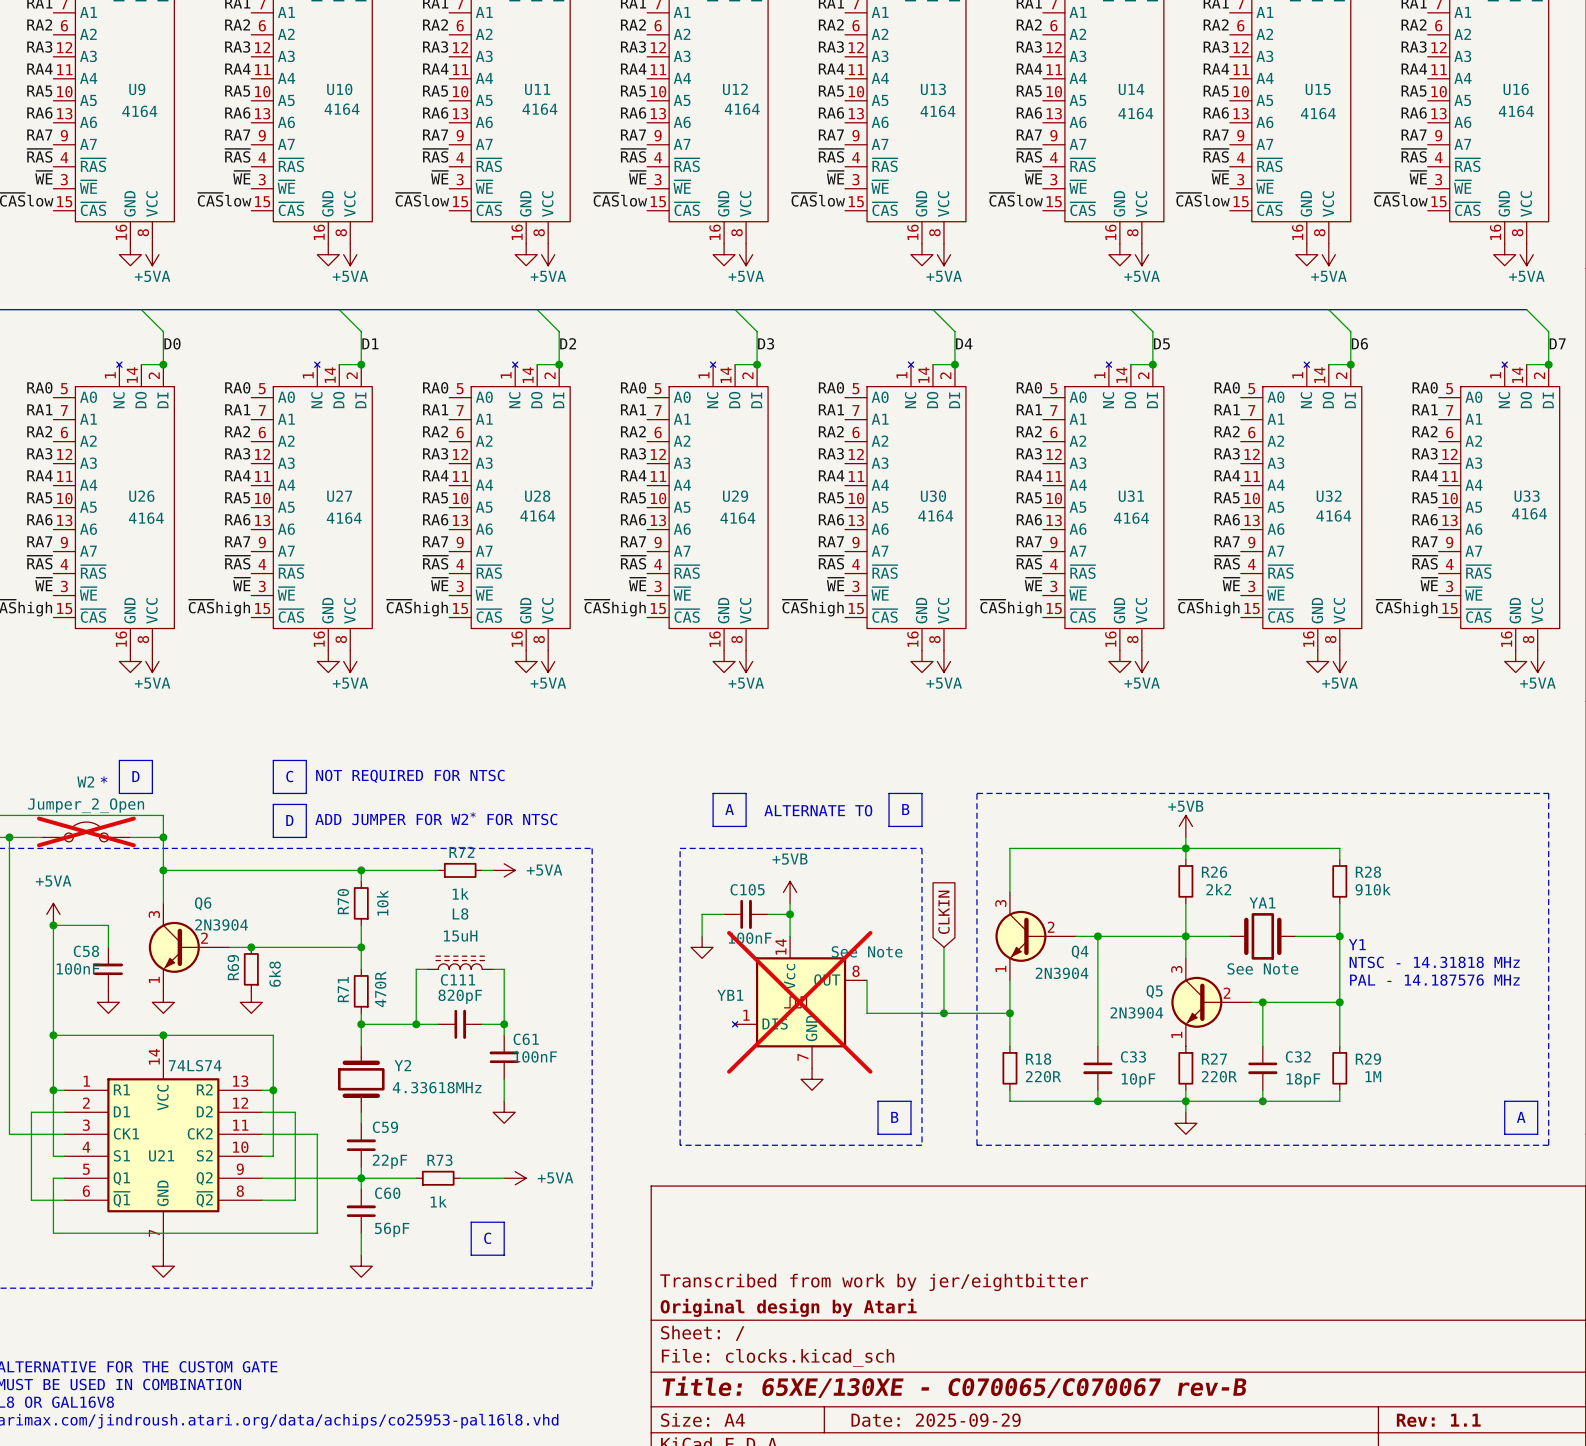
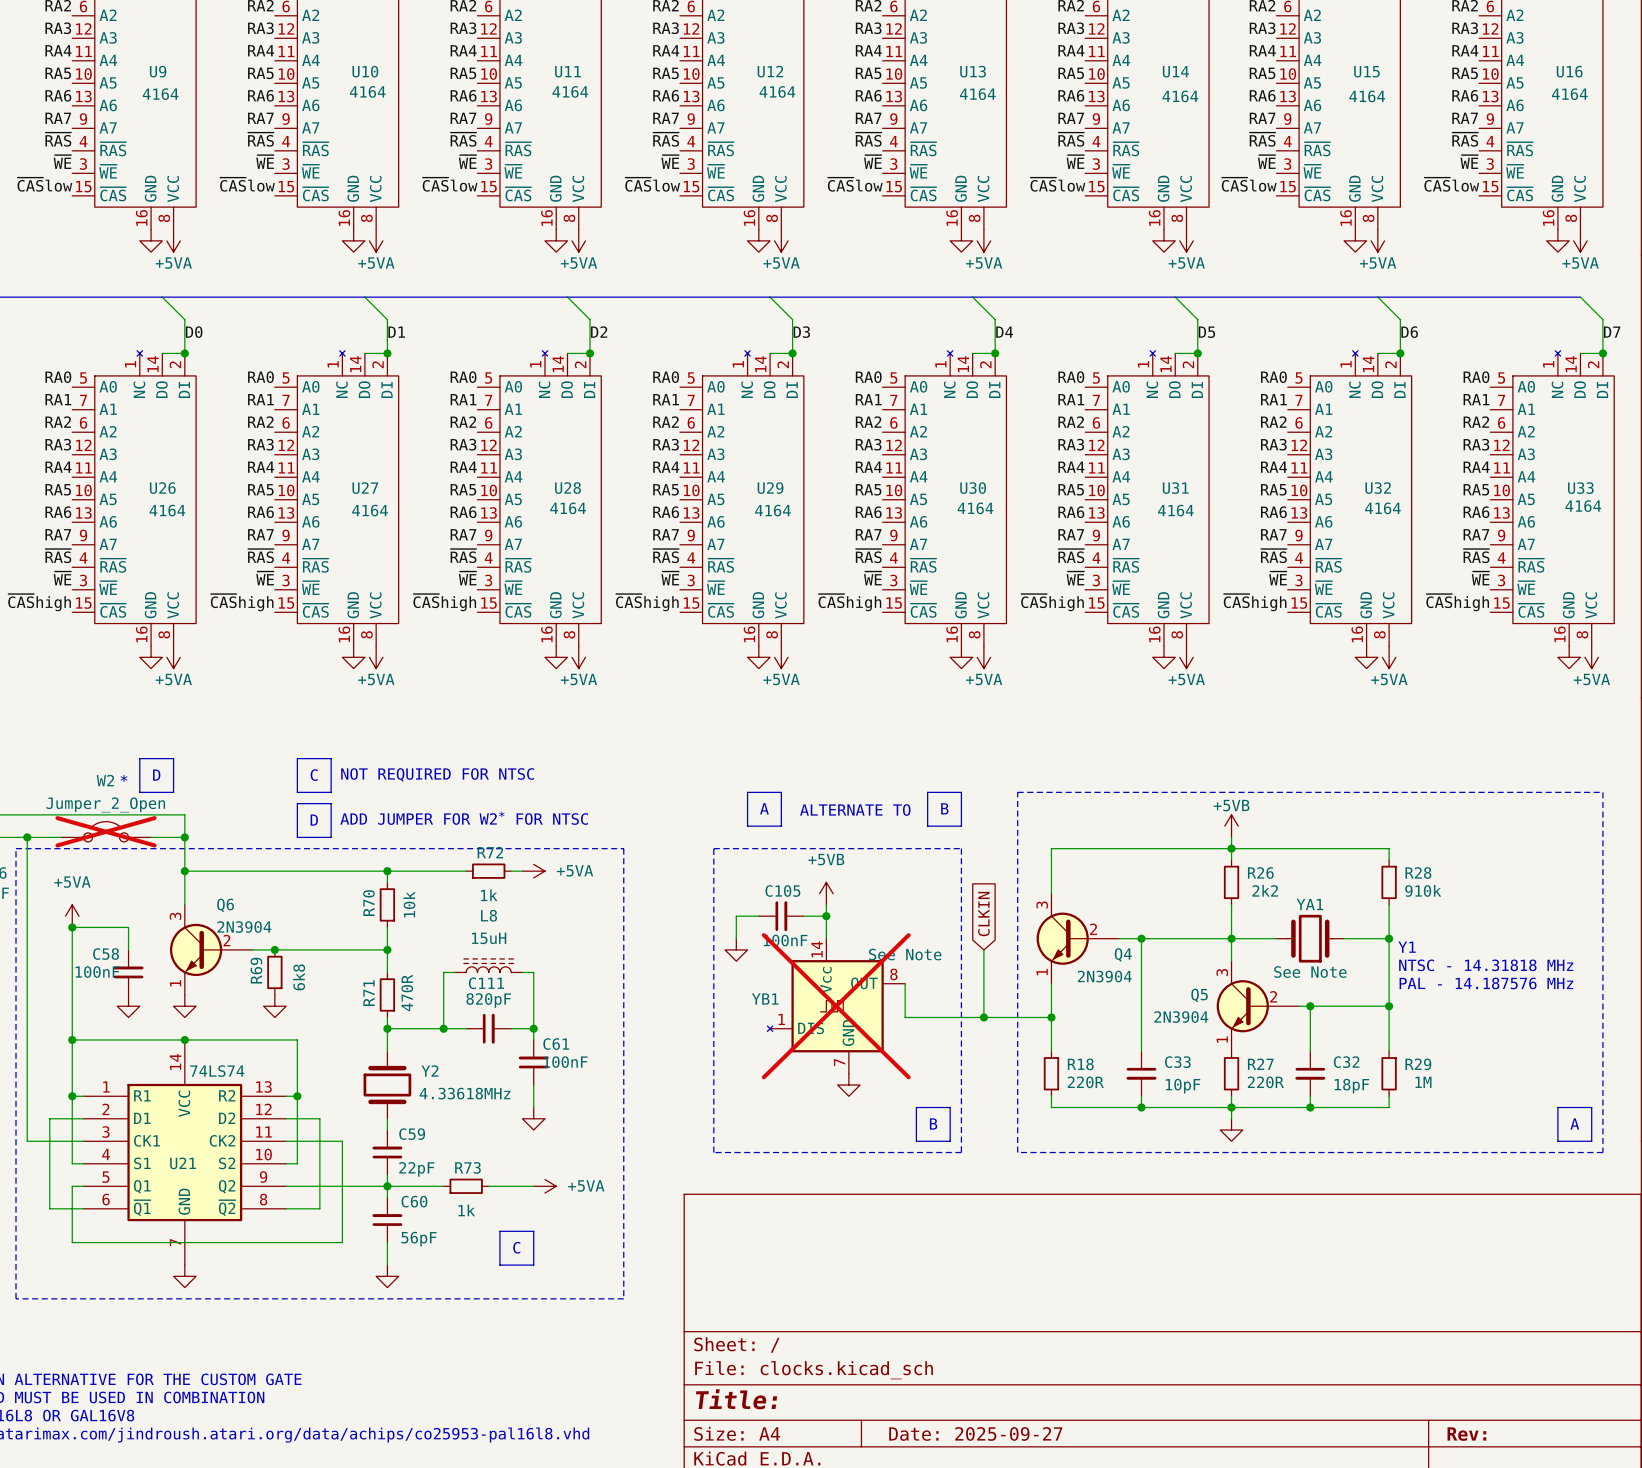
title block: Transcribed from work by jer/eightbitter (874, 1282) -> none
title block: Original design by Atari (788, 1307) -> none
title block: Title: 65XE/130XE - C070065/C070067 rev-B (954, 1387) -> Title: (736, 1399)
title block: Date: 2025-09-29 (936, 1420) -> Date: 2025-09-27 (975, 1433)
title block: Rev: 1.1 (1438, 1420) -> Rev: (1466, 1434)

